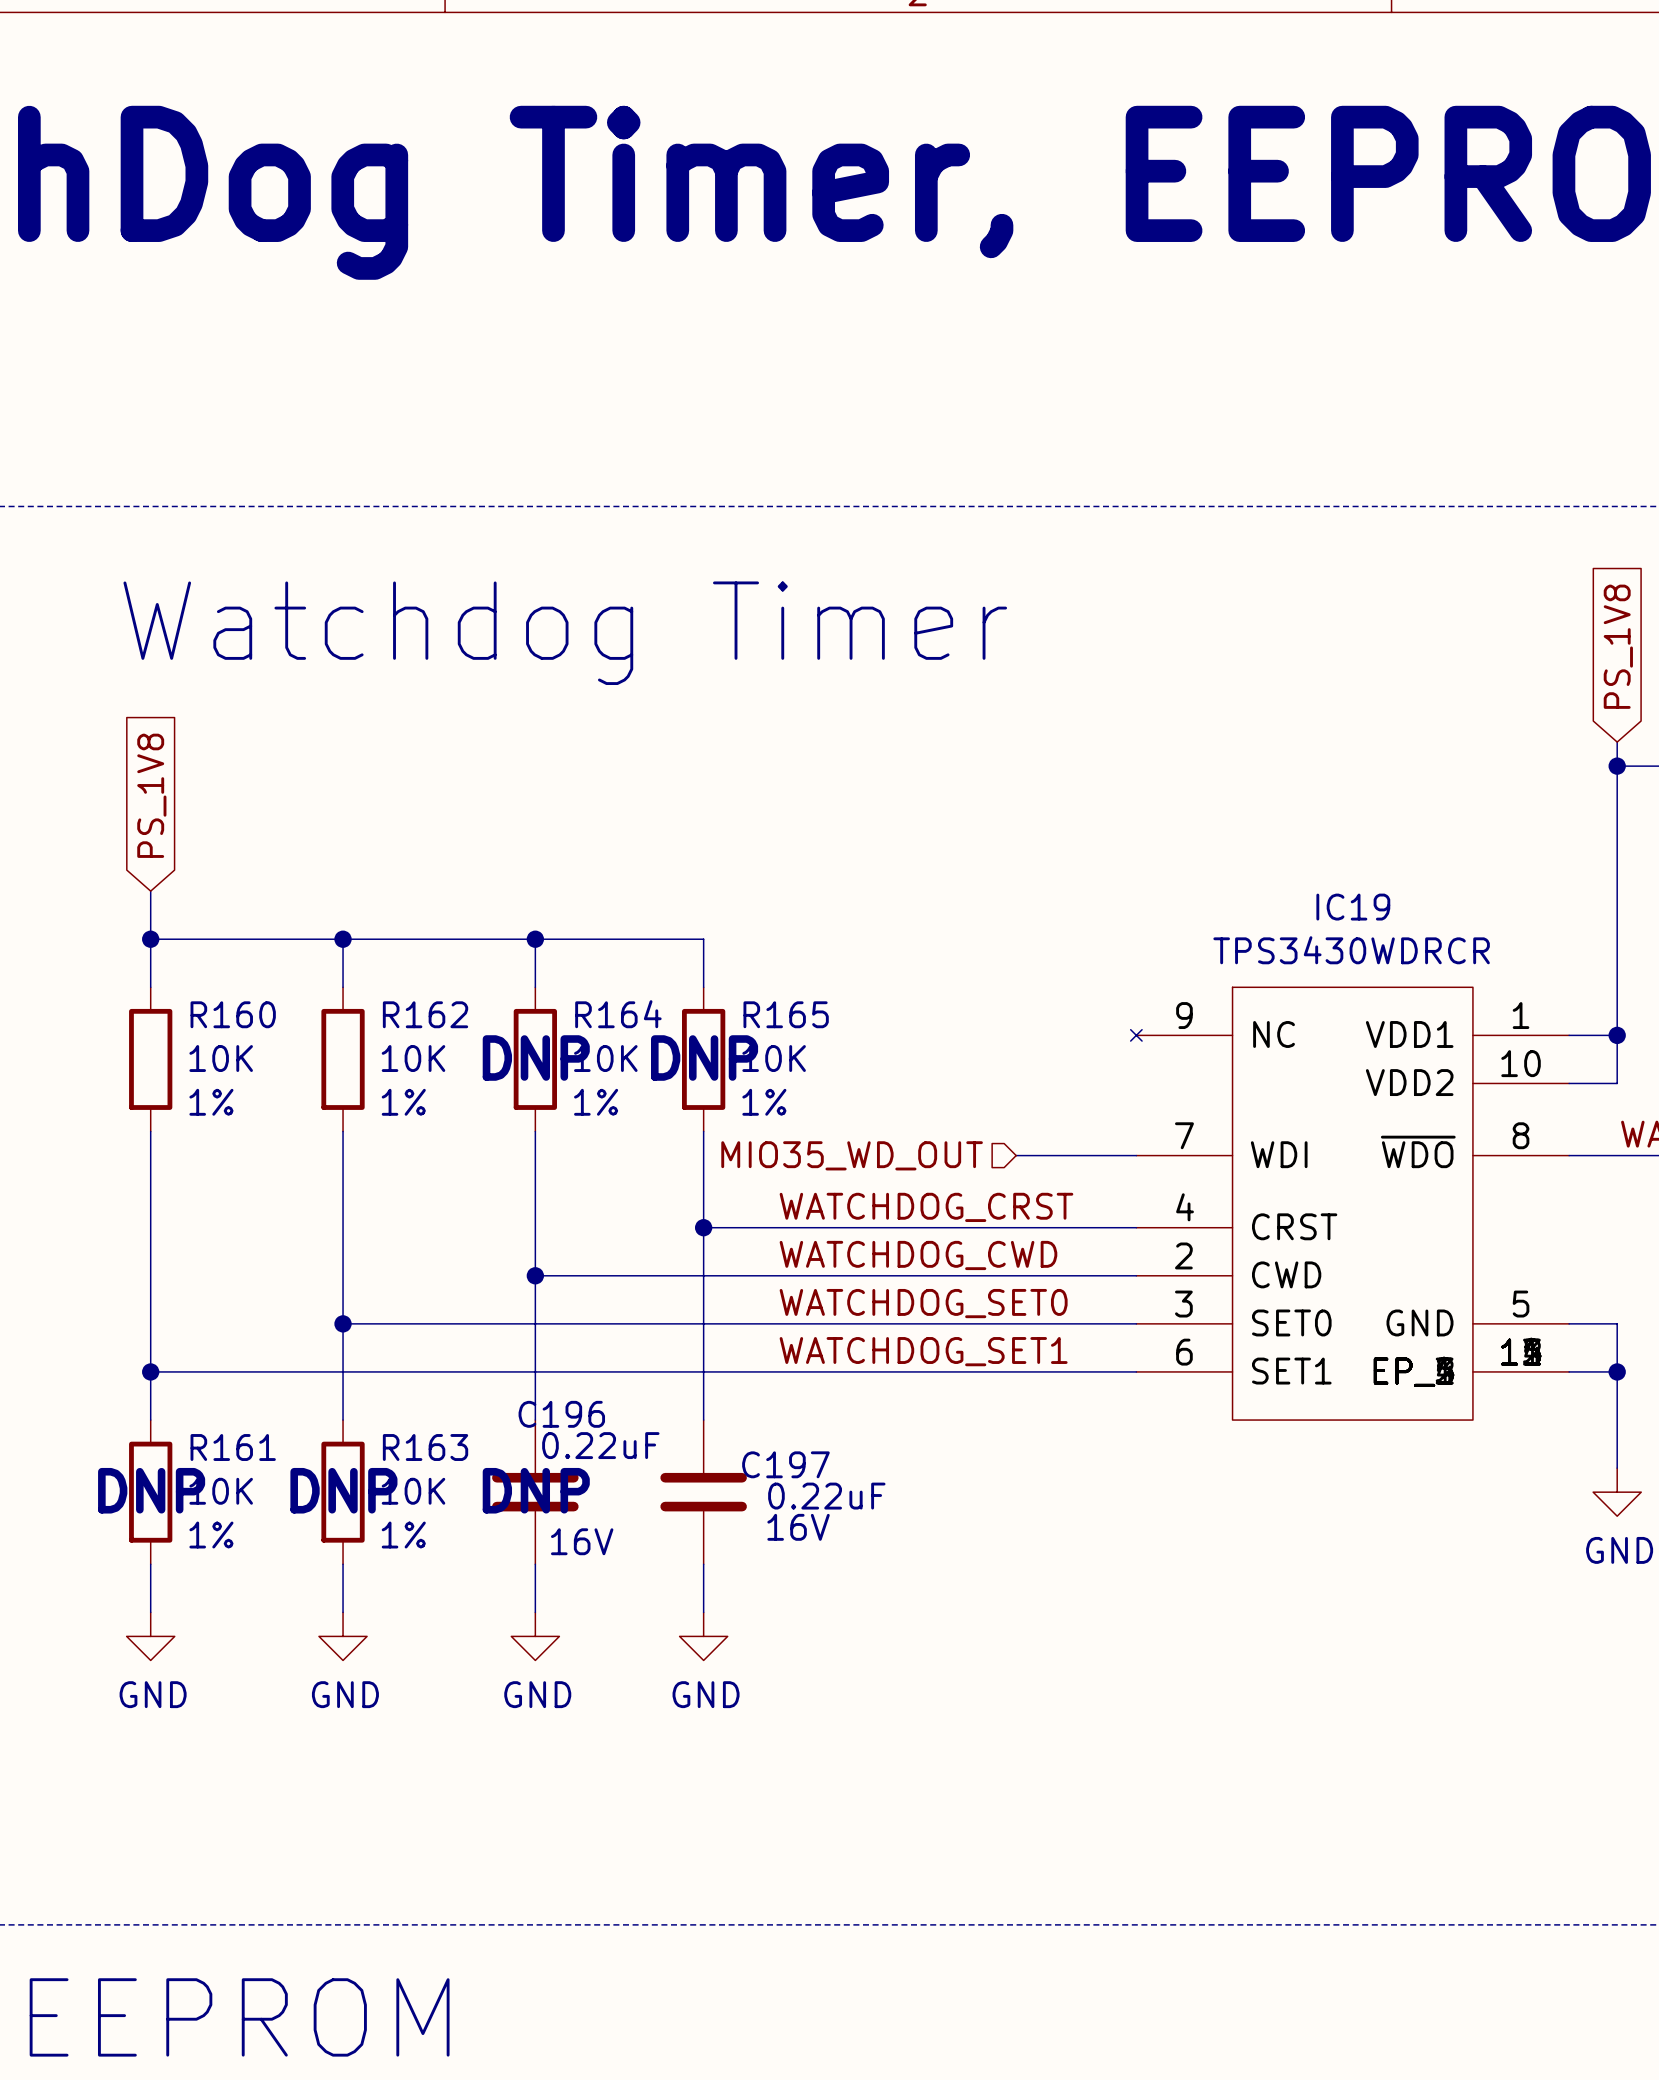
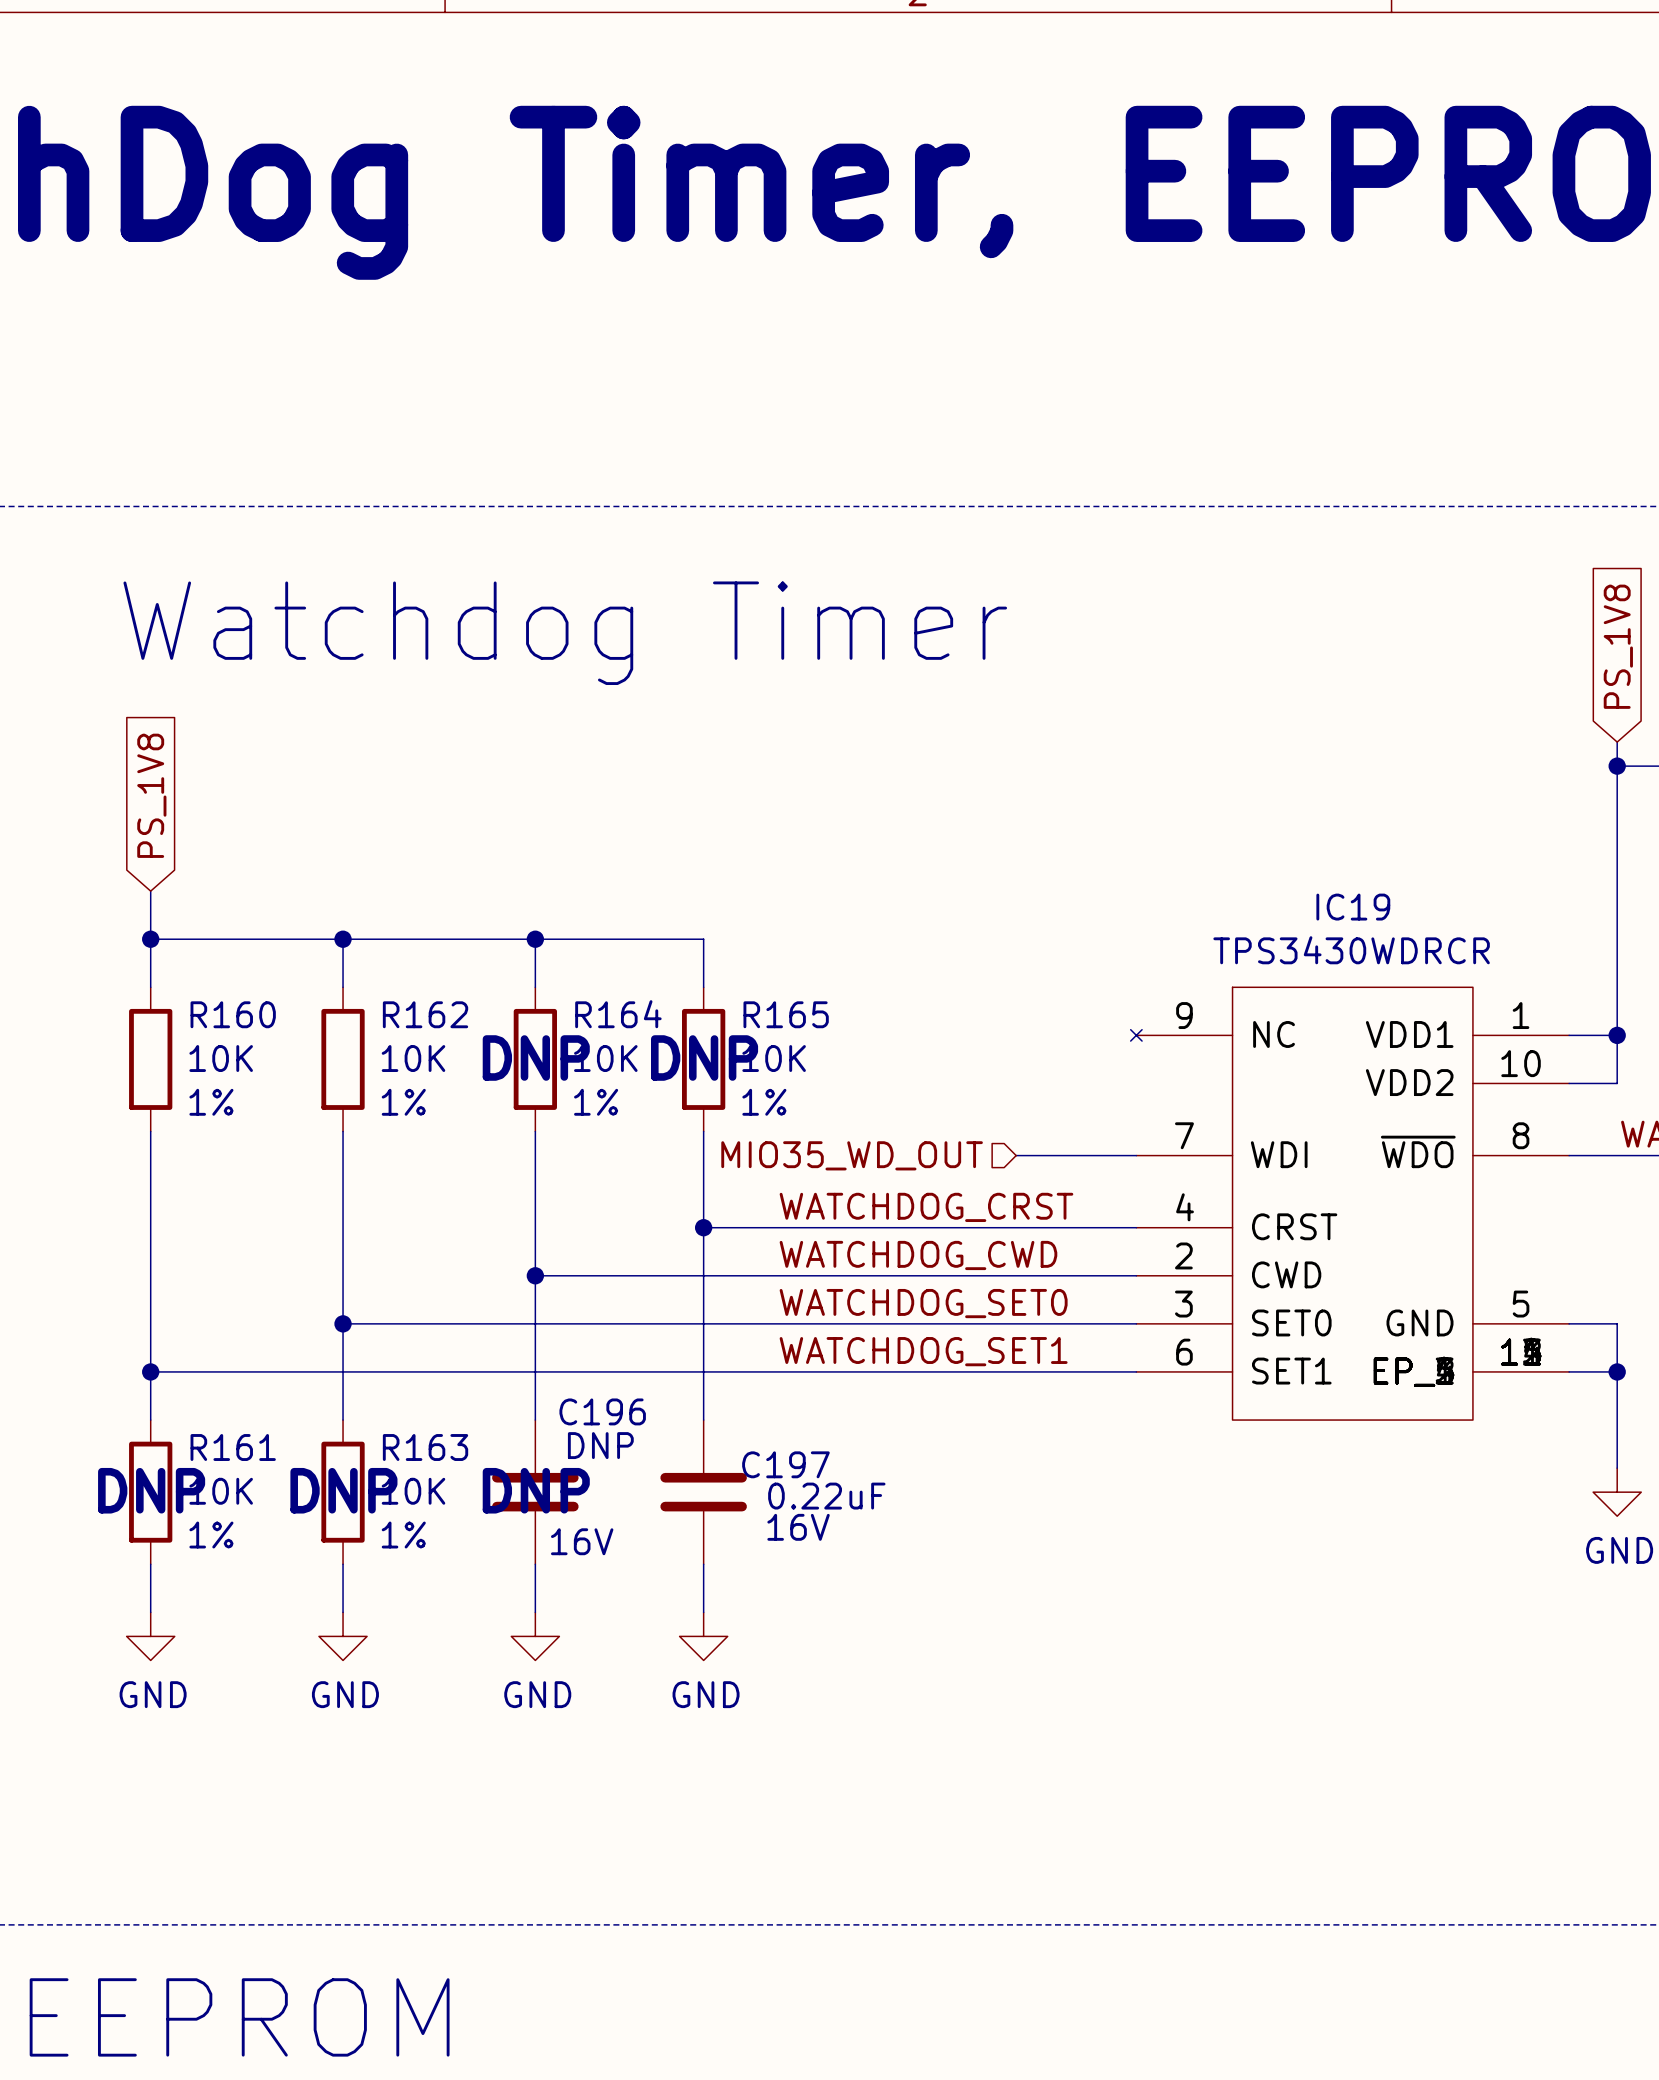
C196 name position: C196 (561, 1414) -> C196 (602, 1411)
C196 value: 0.22uF (600, 1445) -> DNP (600, 1445)

